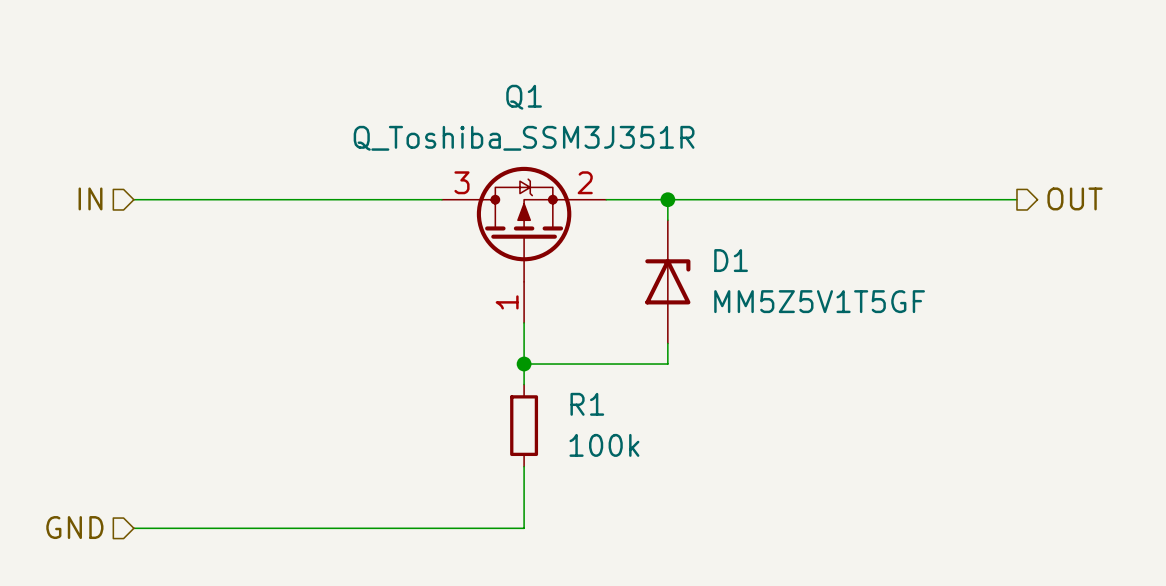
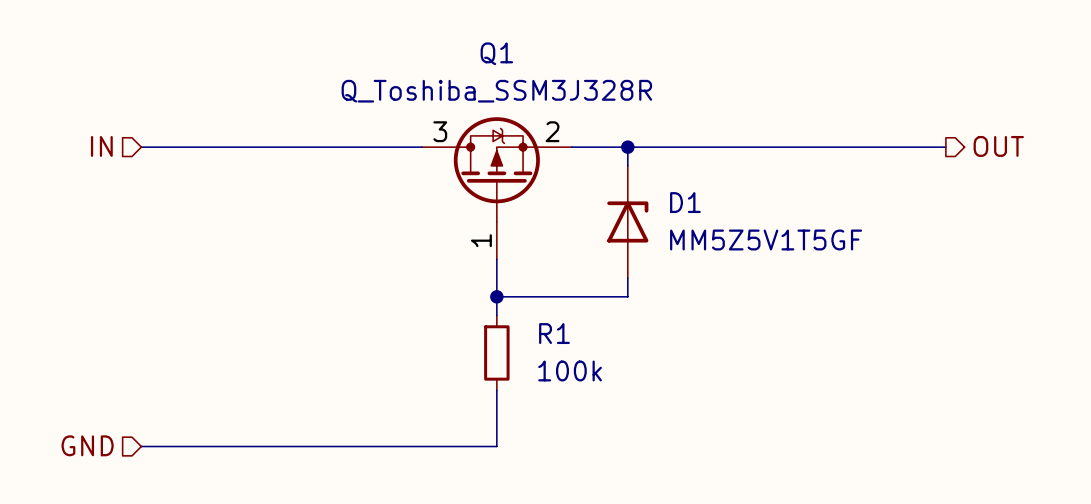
Q1 value: Q_Toshiba_SSM3J351R (524, 138) -> Q_Toshiba_SSM3J328R (496, 91)

